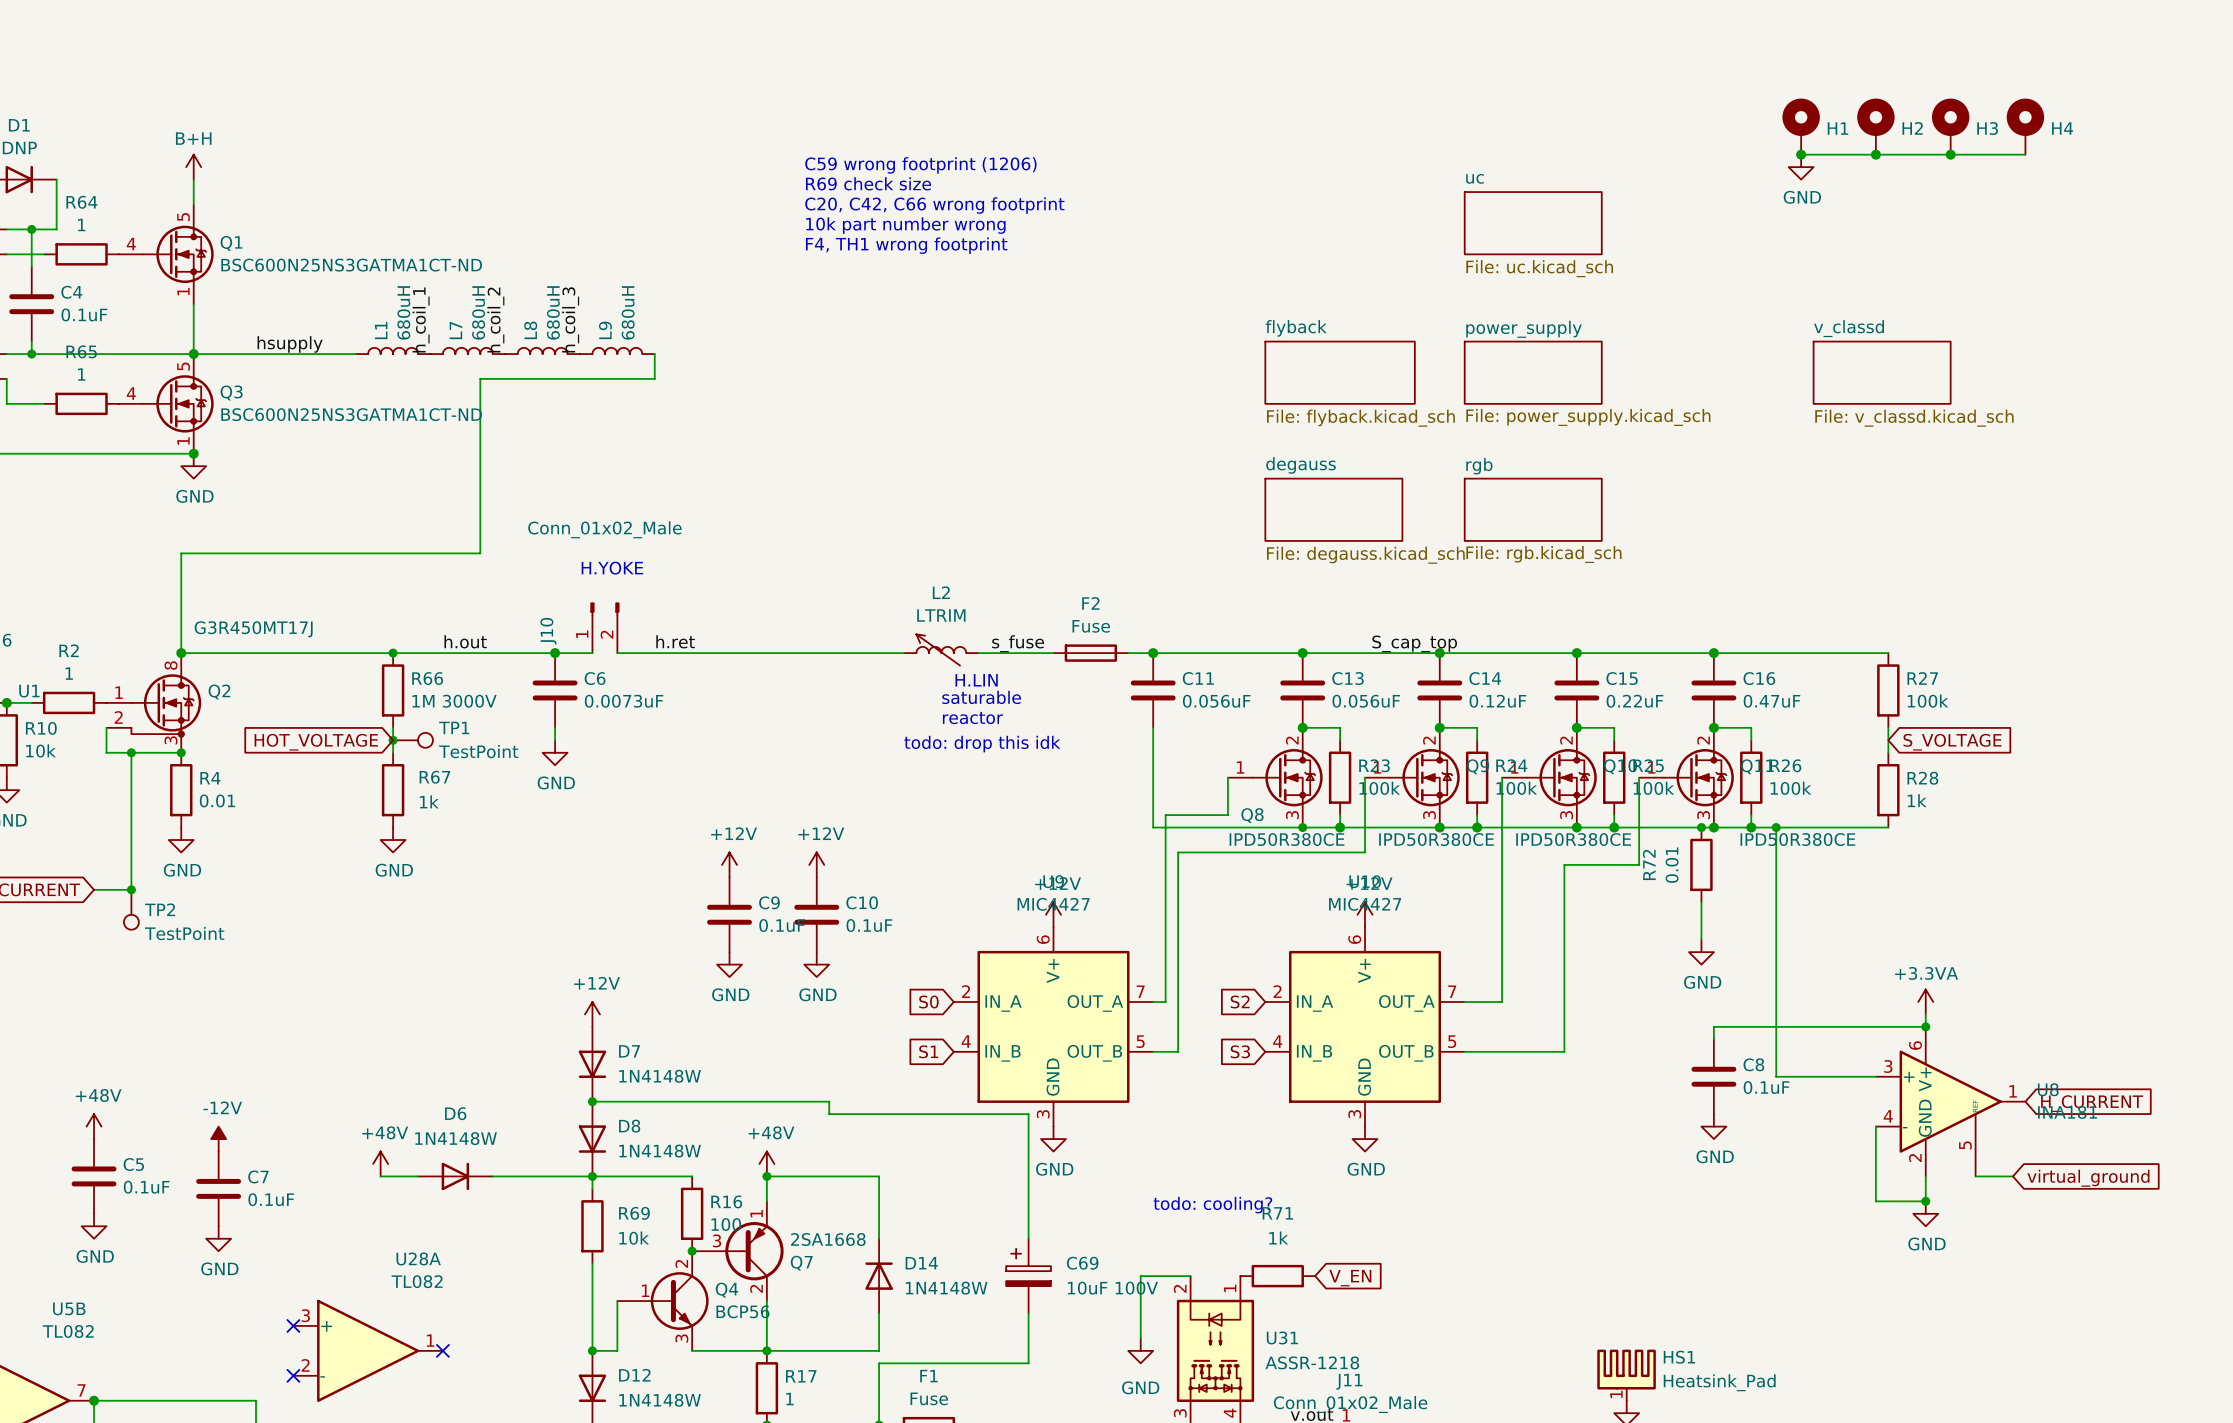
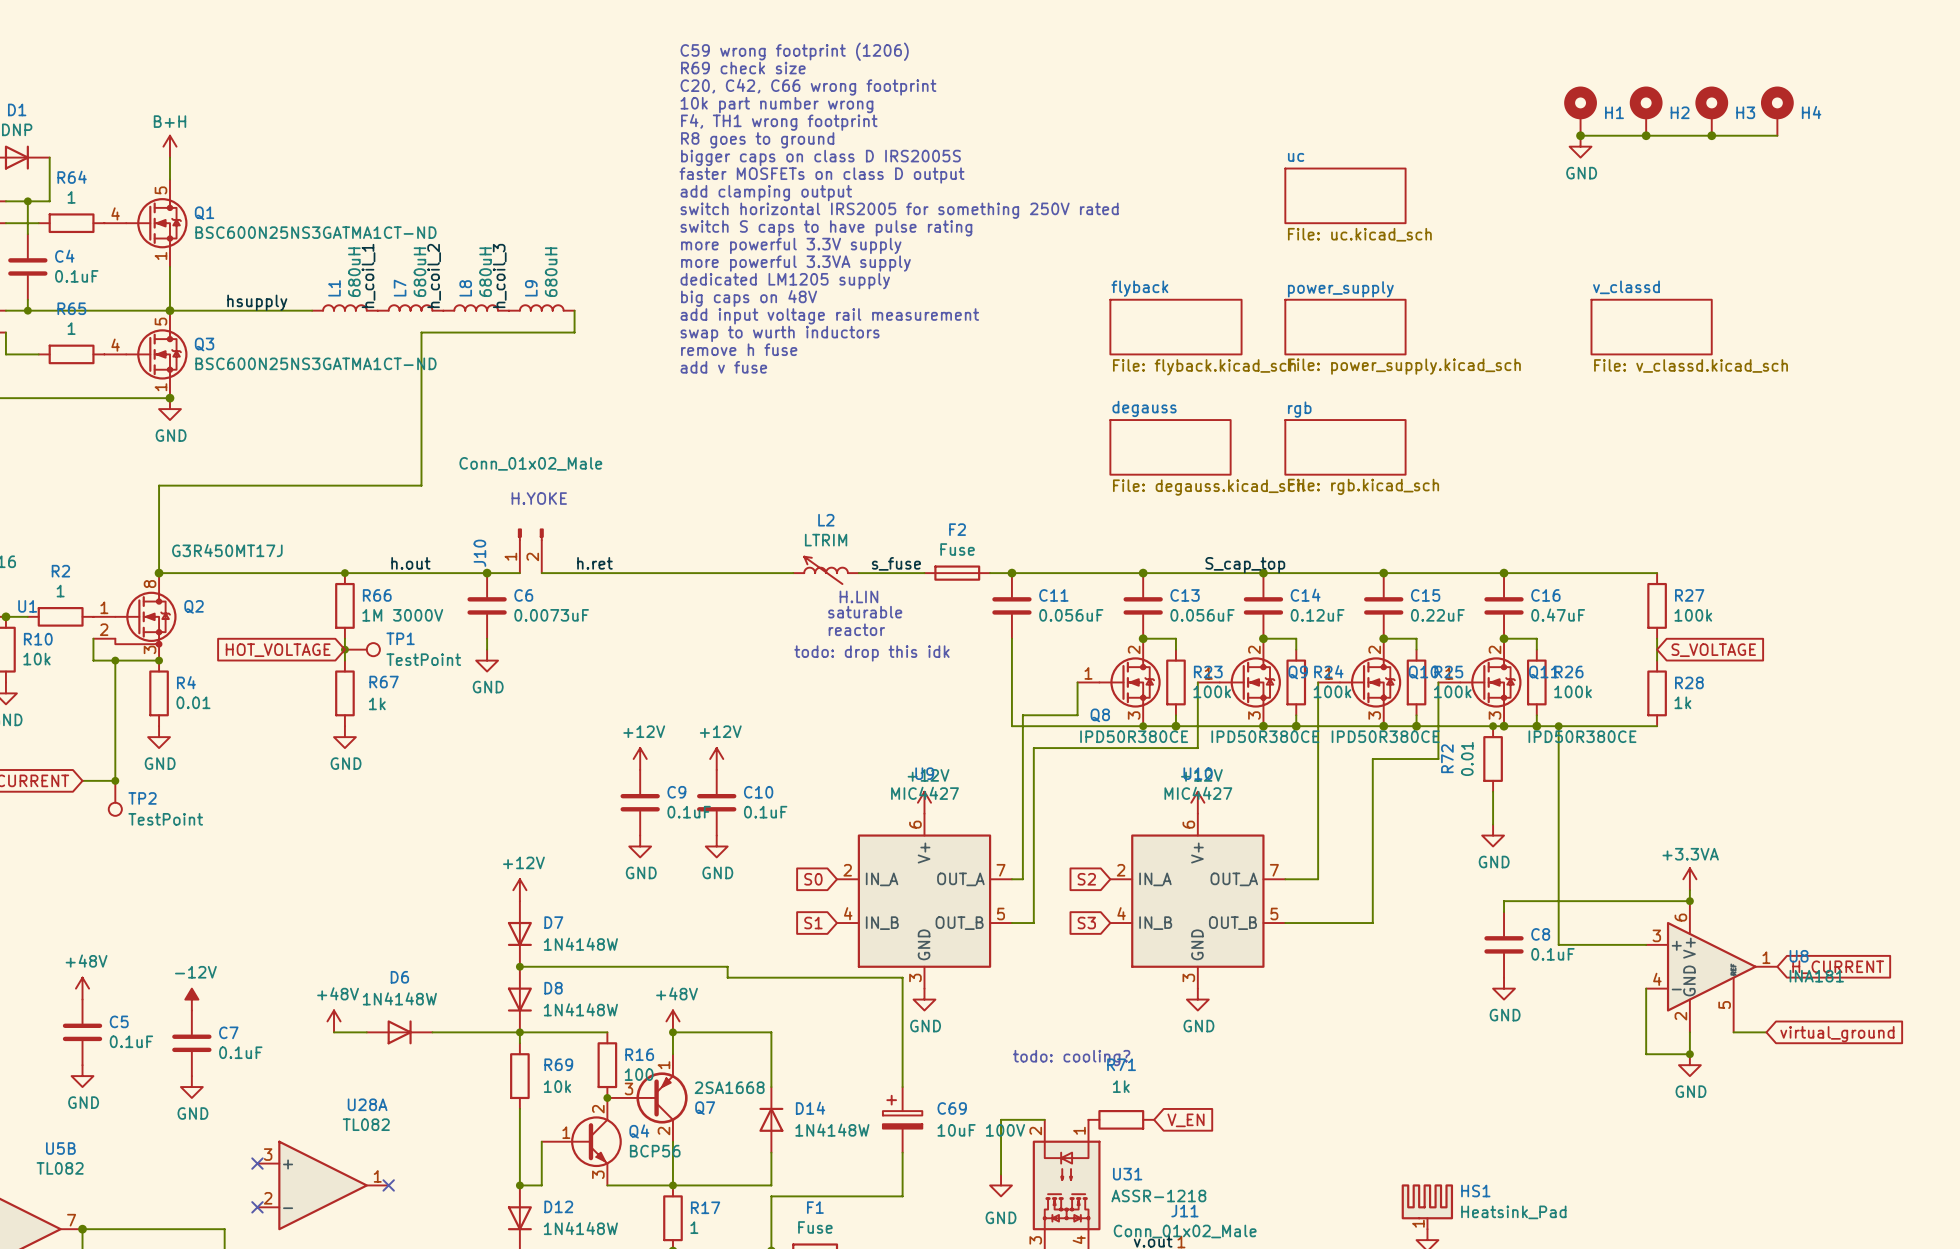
text: none -> R8 goes to ground (757, 140)
text position: C59 wrong footprint (1206) (920, 165) -> C59 wrong footprint (1206) (794, 51)
text: none -> bigger caps on class D IRS2005S (820, 157)
text position: R69 check size (868, 183) -> R69 check size (743, 68)
text: none -> faster MOSFETs on class D output (821, 175)
text position: C20, C42, C66 wrong footprint (934, 205) -> C20, C42, C66 wrong footprint (808, 87)
text: none -> add clamping output (766, 193)
text position: 10k part number wrong (905, 225) -> 10k part number wrong (776, 105)
text: none -> switch horizontal IRS2005 for something 250V rated (899, 210)
text position: F4, TH1 wrong footprint (906, 245) -> F4, TH1 wrong footprint (779, 122)
text: none -> switch S caps to have pulse rating (826, 228)
text: none -> more powerful 3.3V supply (791, 245)
text: none -> more powerful 3.3VA supply (795, 263)
text: none -> dedicated LM1205 supply (785, 281)
text: none -> big caps on 48V (749, 298)
text: none -> add input voltage rail measurement (829, 316)
text: none -> swap to wurth inductors (780, 333)
text: none -> remove h fuse (739, 349)
text: none -> add v fuse (723, 367)

